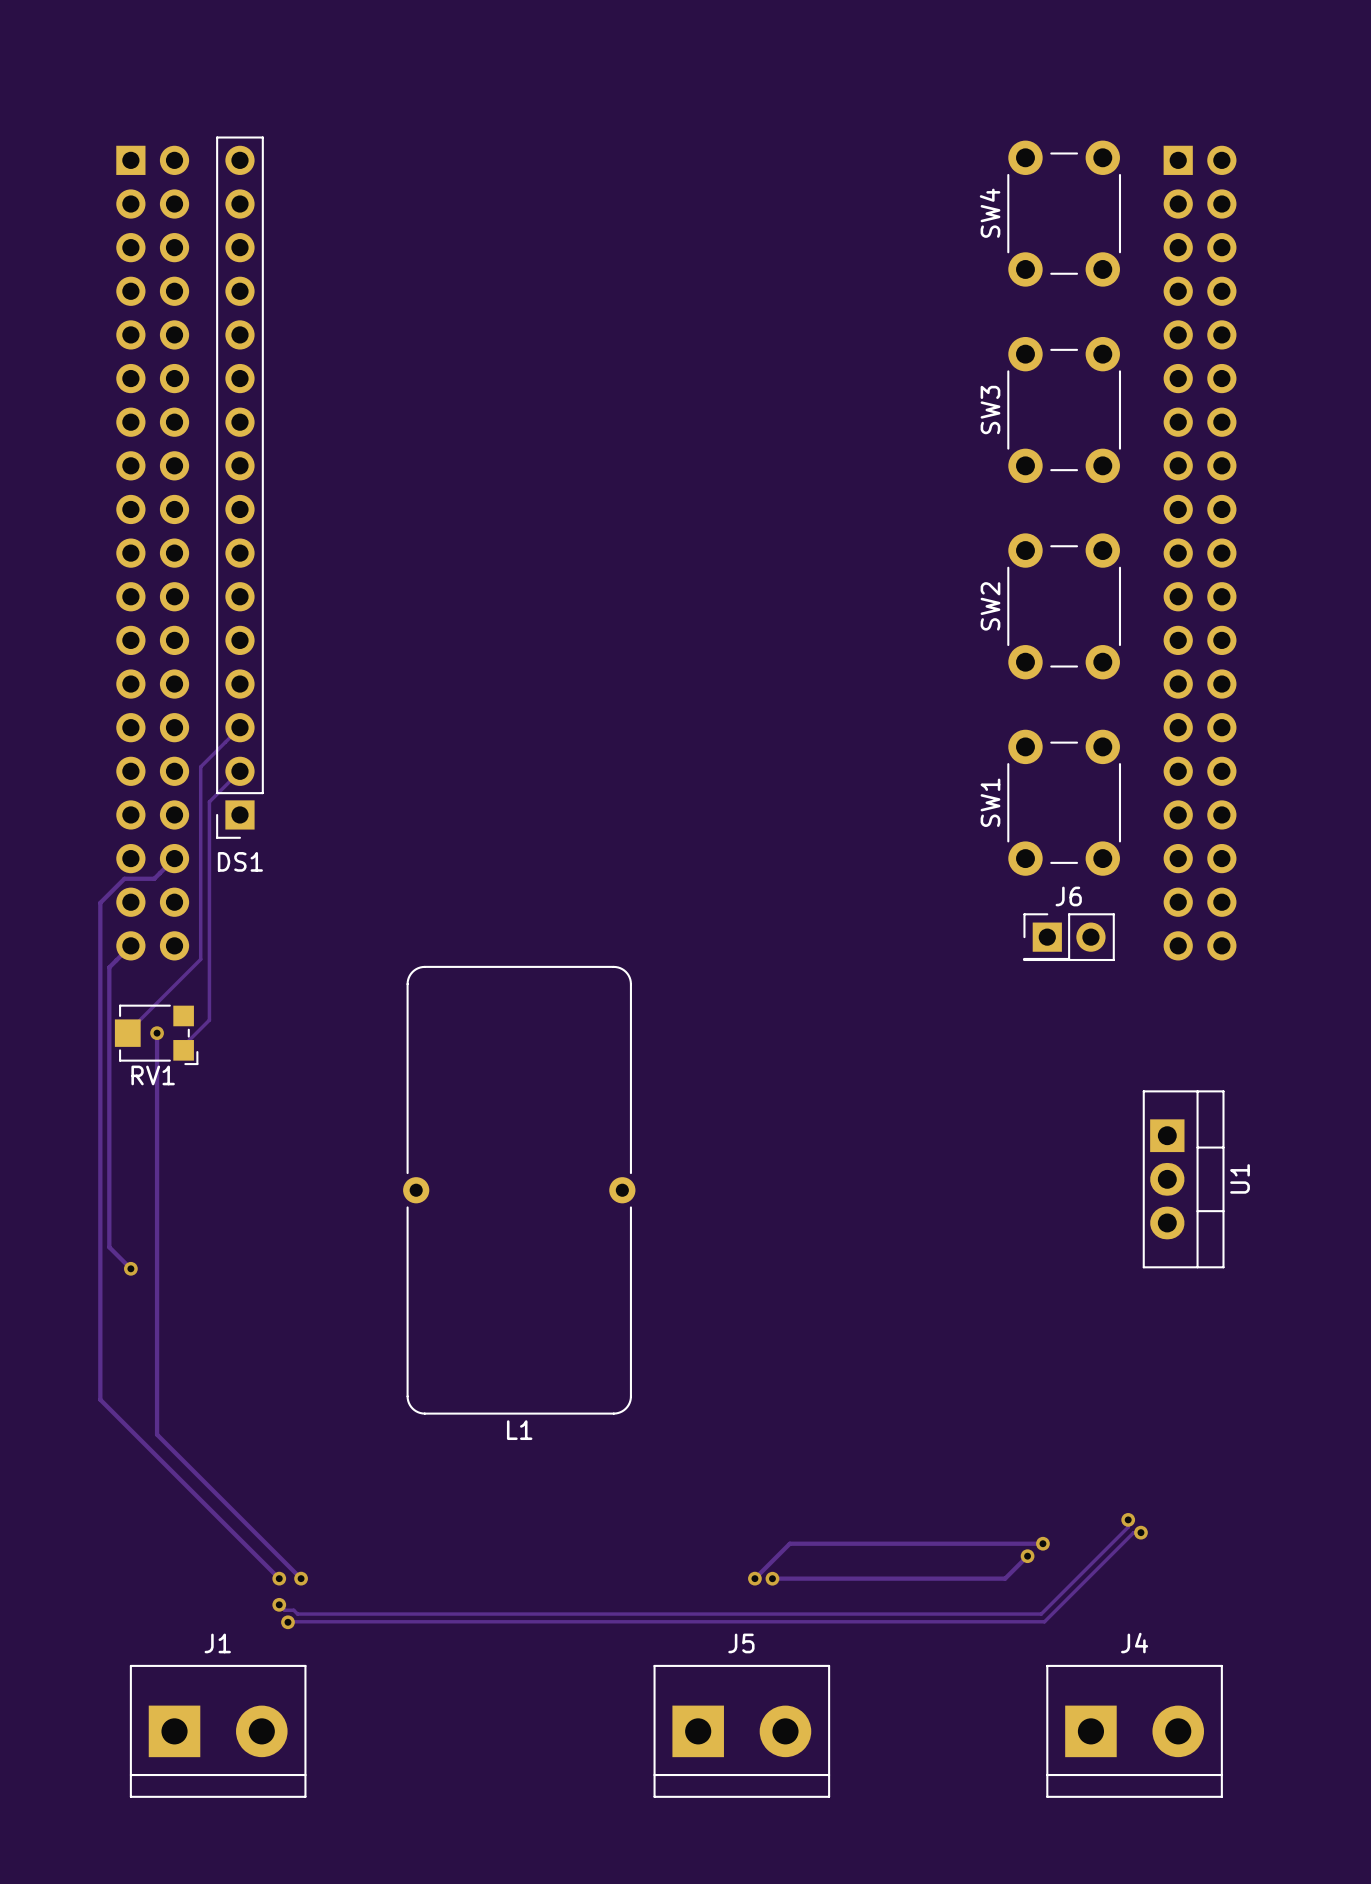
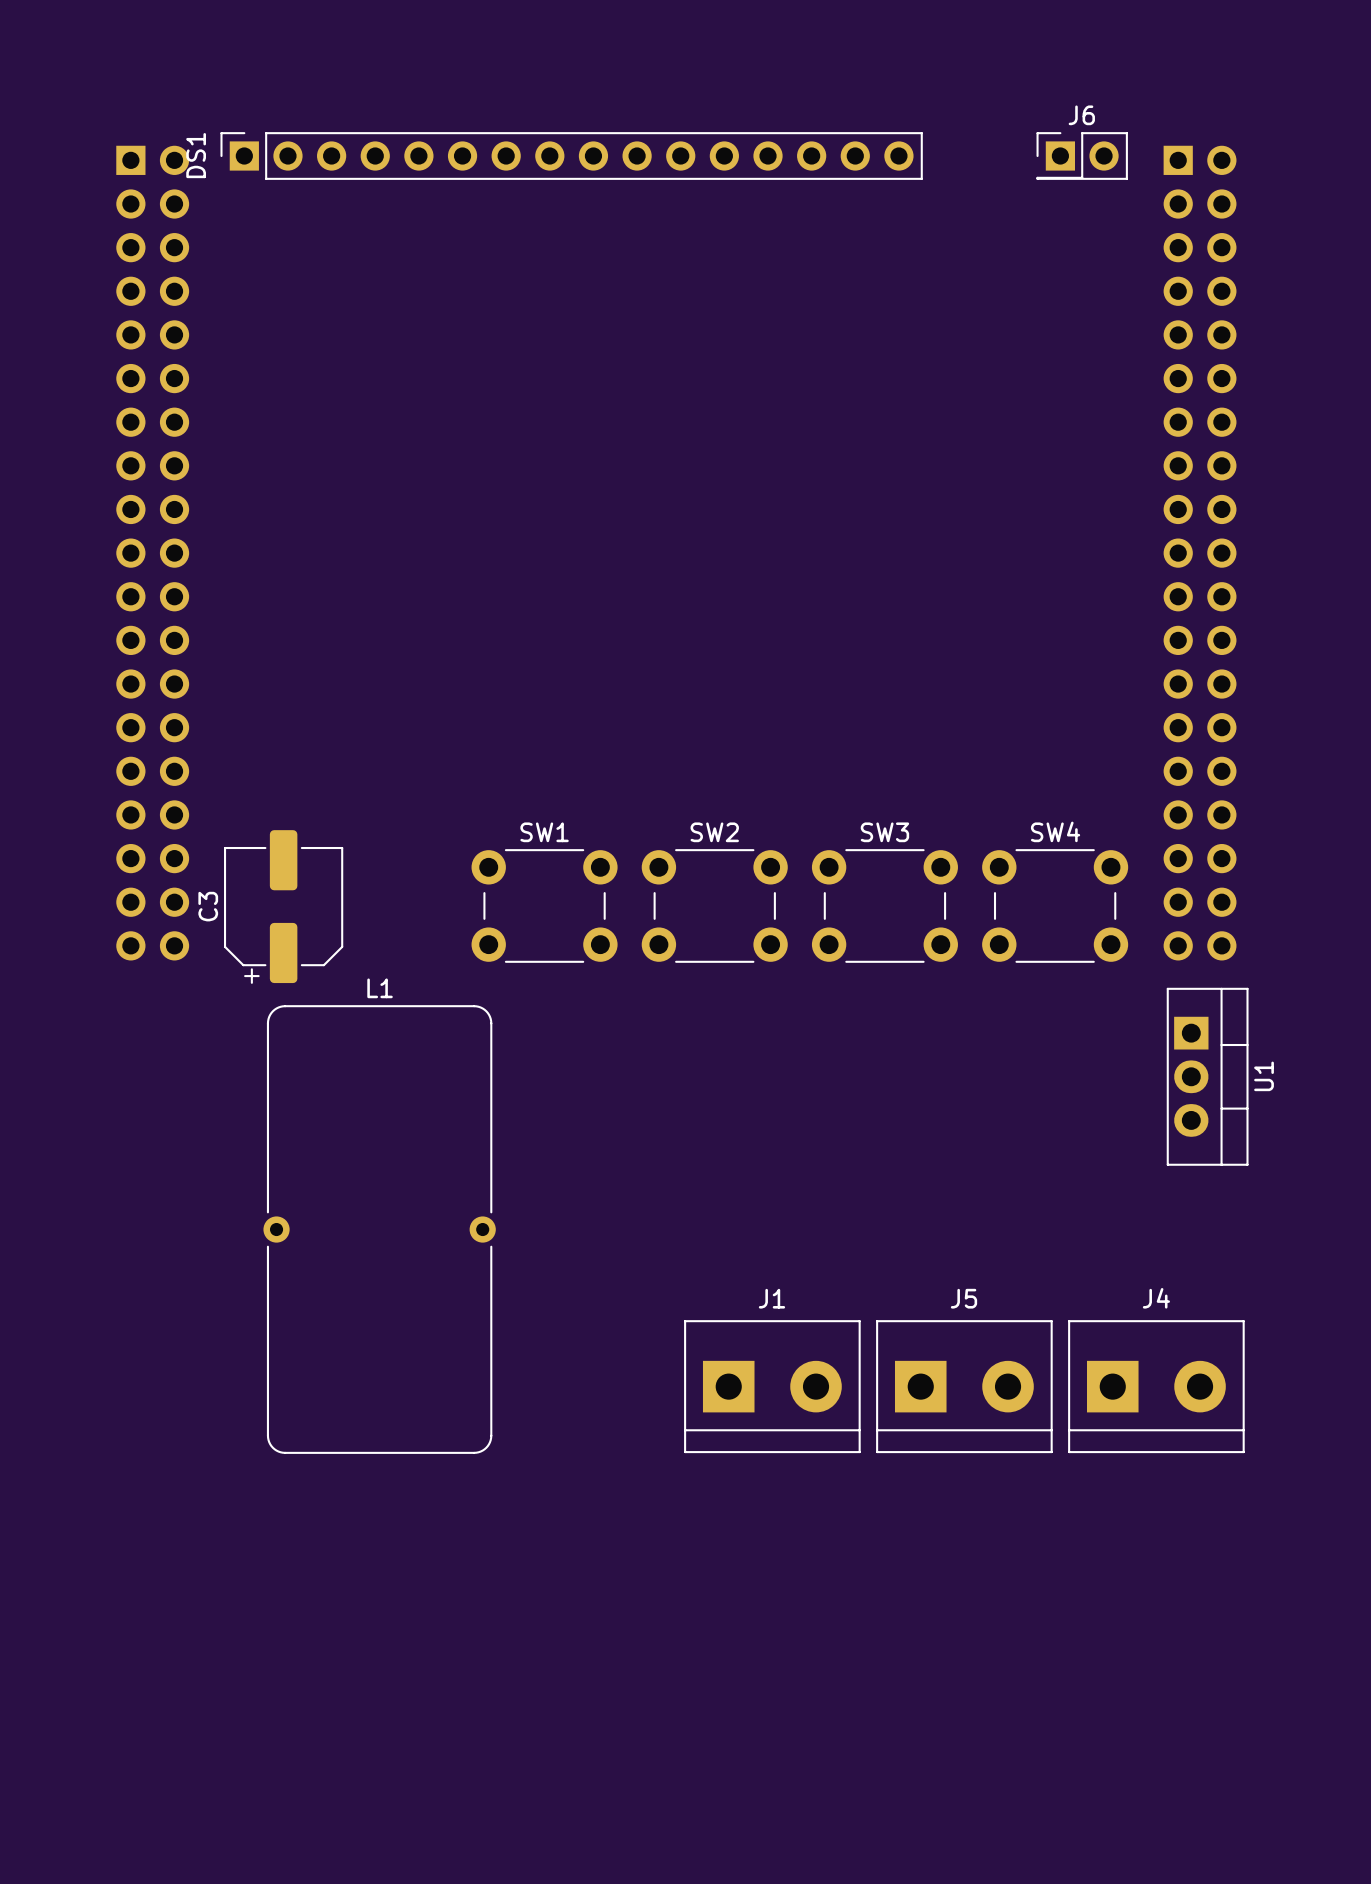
SW4 rotation: 0° (1064, 213) -> 90° clockwise (1055, 905)
SW4 position: (1064, 213) -> (1055, 905)
SW3 rotation: 0° (1064, 410) -> 90° clockwise (884, 905)
SW3 position: (1064, 410) -> (884, 905)
DS1 rotation: 0° (239, 487) -> 90° clockwise (571, 156)
DS1 position: (239, 487) -> (571, 156)
SW2 rotation: 0° (1064, 606) -> 90° clockwise (714, 905)
SW2 position: (1064, 606) -> (714, 905)
track: (239, 727) (200, 766) (200, 959) (127, 1033) -> none
track: (239, 771) (209, 801) (209, 1020) (179, 1050) (183, 1050) -> none
SW1 rotation: 0° (1064, 802) -> 90° clockwise (544, 905)
SW1 position: (1064, 802) -> (544, 905)
track: (174, 858) (154, 878) (124, 878) (100, 902) (100, 1399) (279, 1578) -> none
C3: none -> (283, 907)
J6 position: (1069, 937) -> (1082, 156)
track: (130, 945) (109, 967) (109, 1247) (130, 1268) -> none
track: (157, 1033) (157, 1434) (301, 1578) -> none
via: (157, 1033) -> none
RV1: (156, 1034) -> none
U1 position: (1183, 1179) -> (1207, 1076)
L1 position: (519, 1190) -> (379, 1229)
via: (130, 1268) -> none
L1 name position: L1 (519, 1430) -> L1 (380, 988)
track: (1128, 1519) (1128, 1527) (1041, 1614) (297, 1614) (293, 1610) (284, 1610) (279, 1604) -> none
via: (1128, 1519) -> none
track: (1134, 1532) (1044, 1621) (287, 1622) -> none
via: (1140, 1532) -> none
track: (1042, 1543) (789, 1543) (754, 1578) -> none
via: (1042, 1543) -> none
track: (1027, 1556) (1005, 1578) (772, 1578) -> none
via: (1027, 1556) -> none
via: (279, 1578) -> none
via: (301, 1578) -> none
via: (754, 1578) -> none
via: (772, 1578) -> none
via: (279, 1604) -> none
via: (287, 1622) -> none
J1 position: (218, 1731) -> (772, 1386)
J5 position: (741, 1731) -> (964, 1386)
J4 position: (1134, 1731) -> (1156, 1386)

